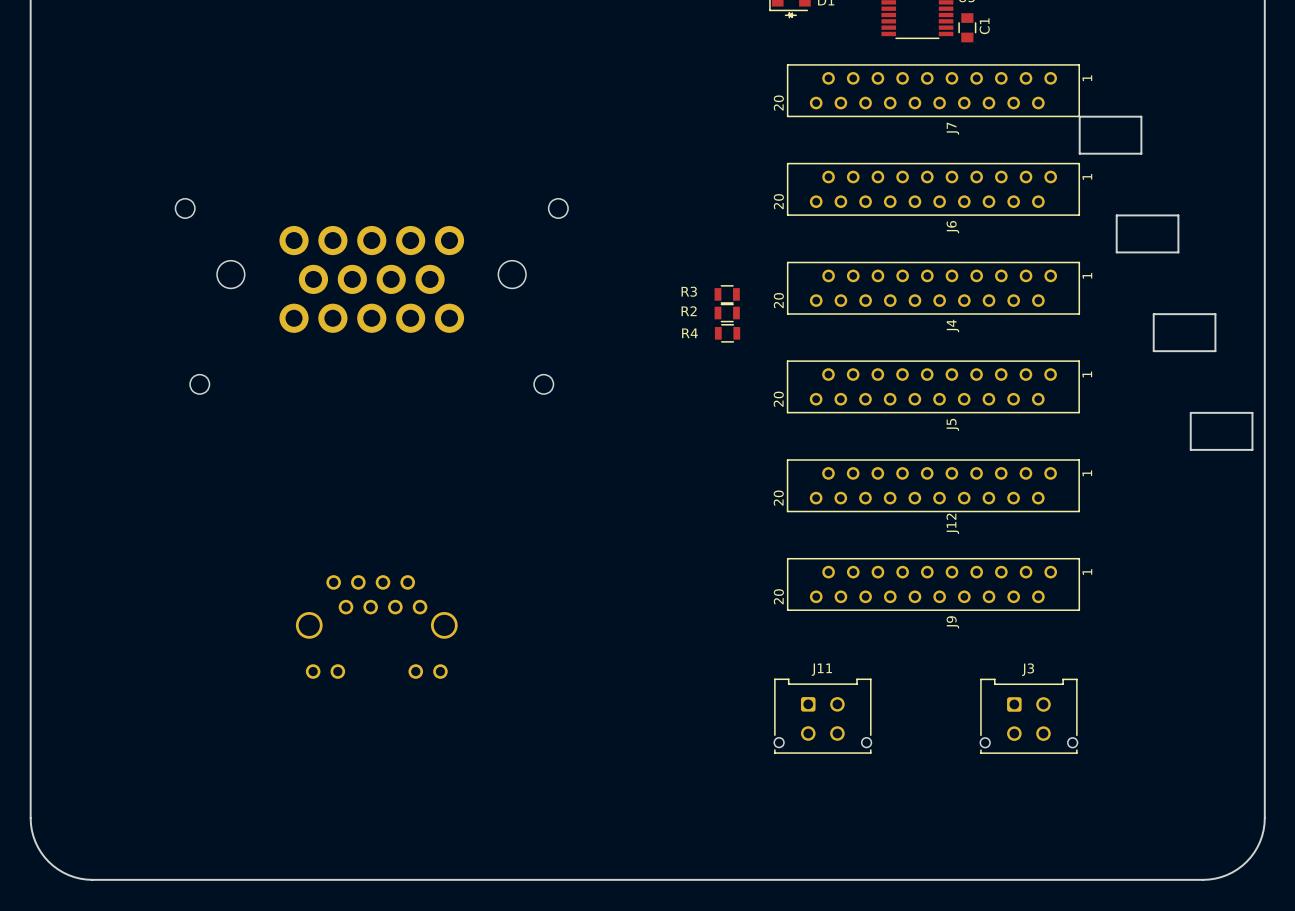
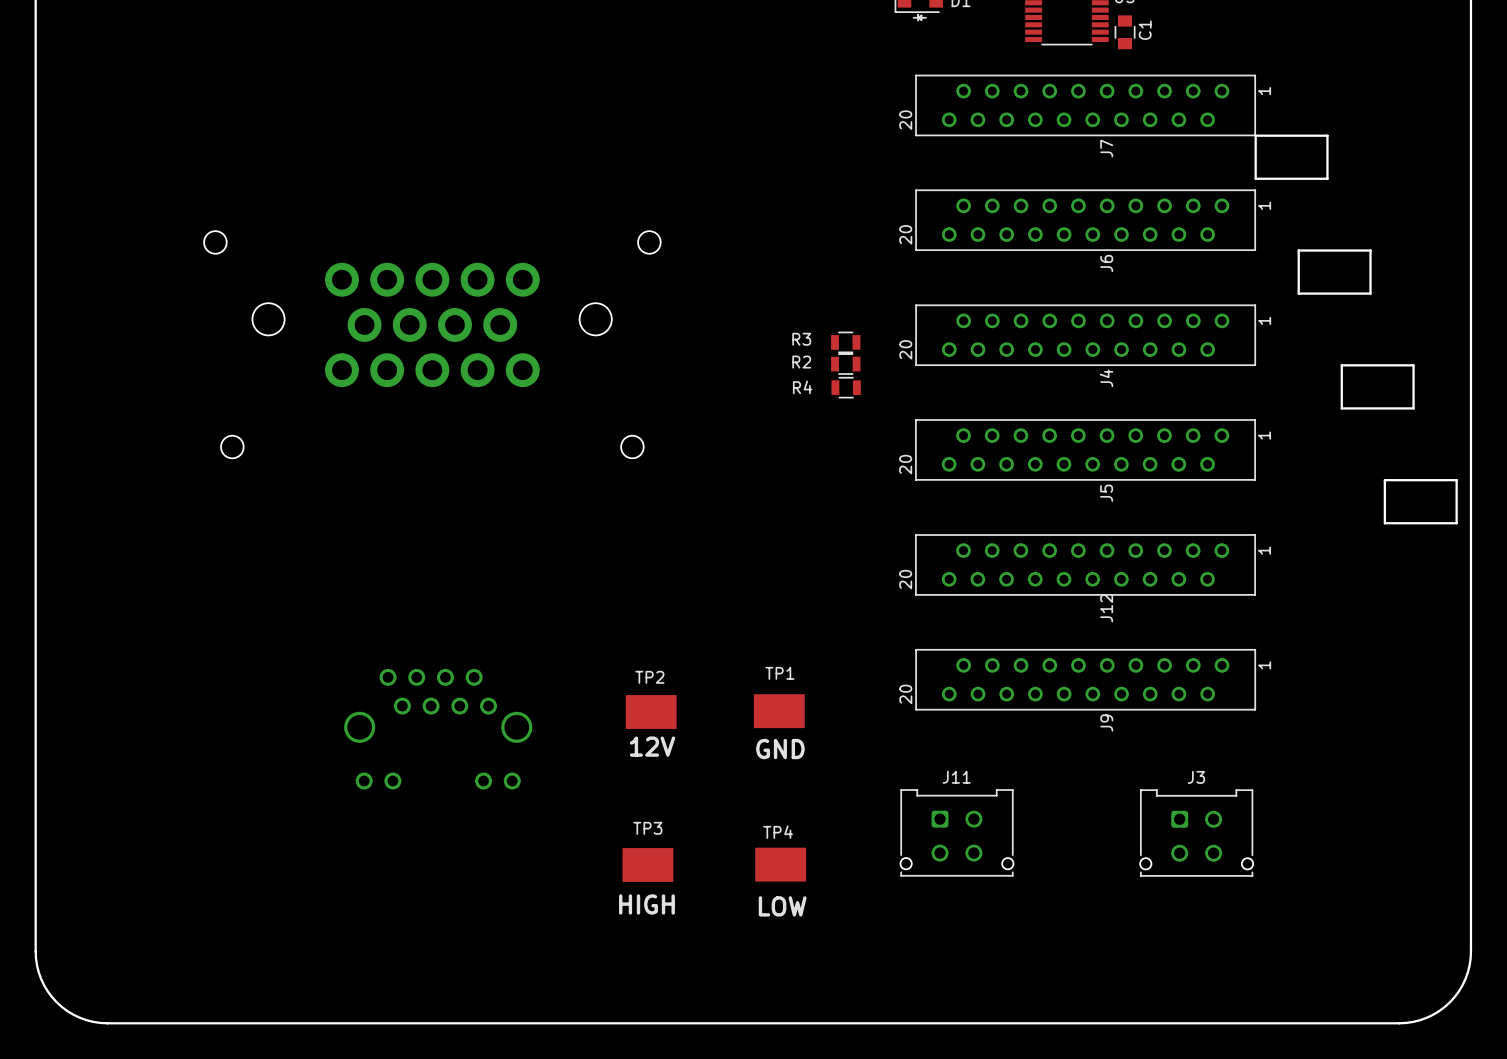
TP1: none -> (779, 711)
TP2: none -> (651, 712)
text: none -> 12V (652, 746)
text: none -> GND (780, 749)
TP3: none -> (647, 865)
TP4: none -> (780, 864)
text: none -> HIGH (646, 904)
text: none -> LOW (782, 906)

